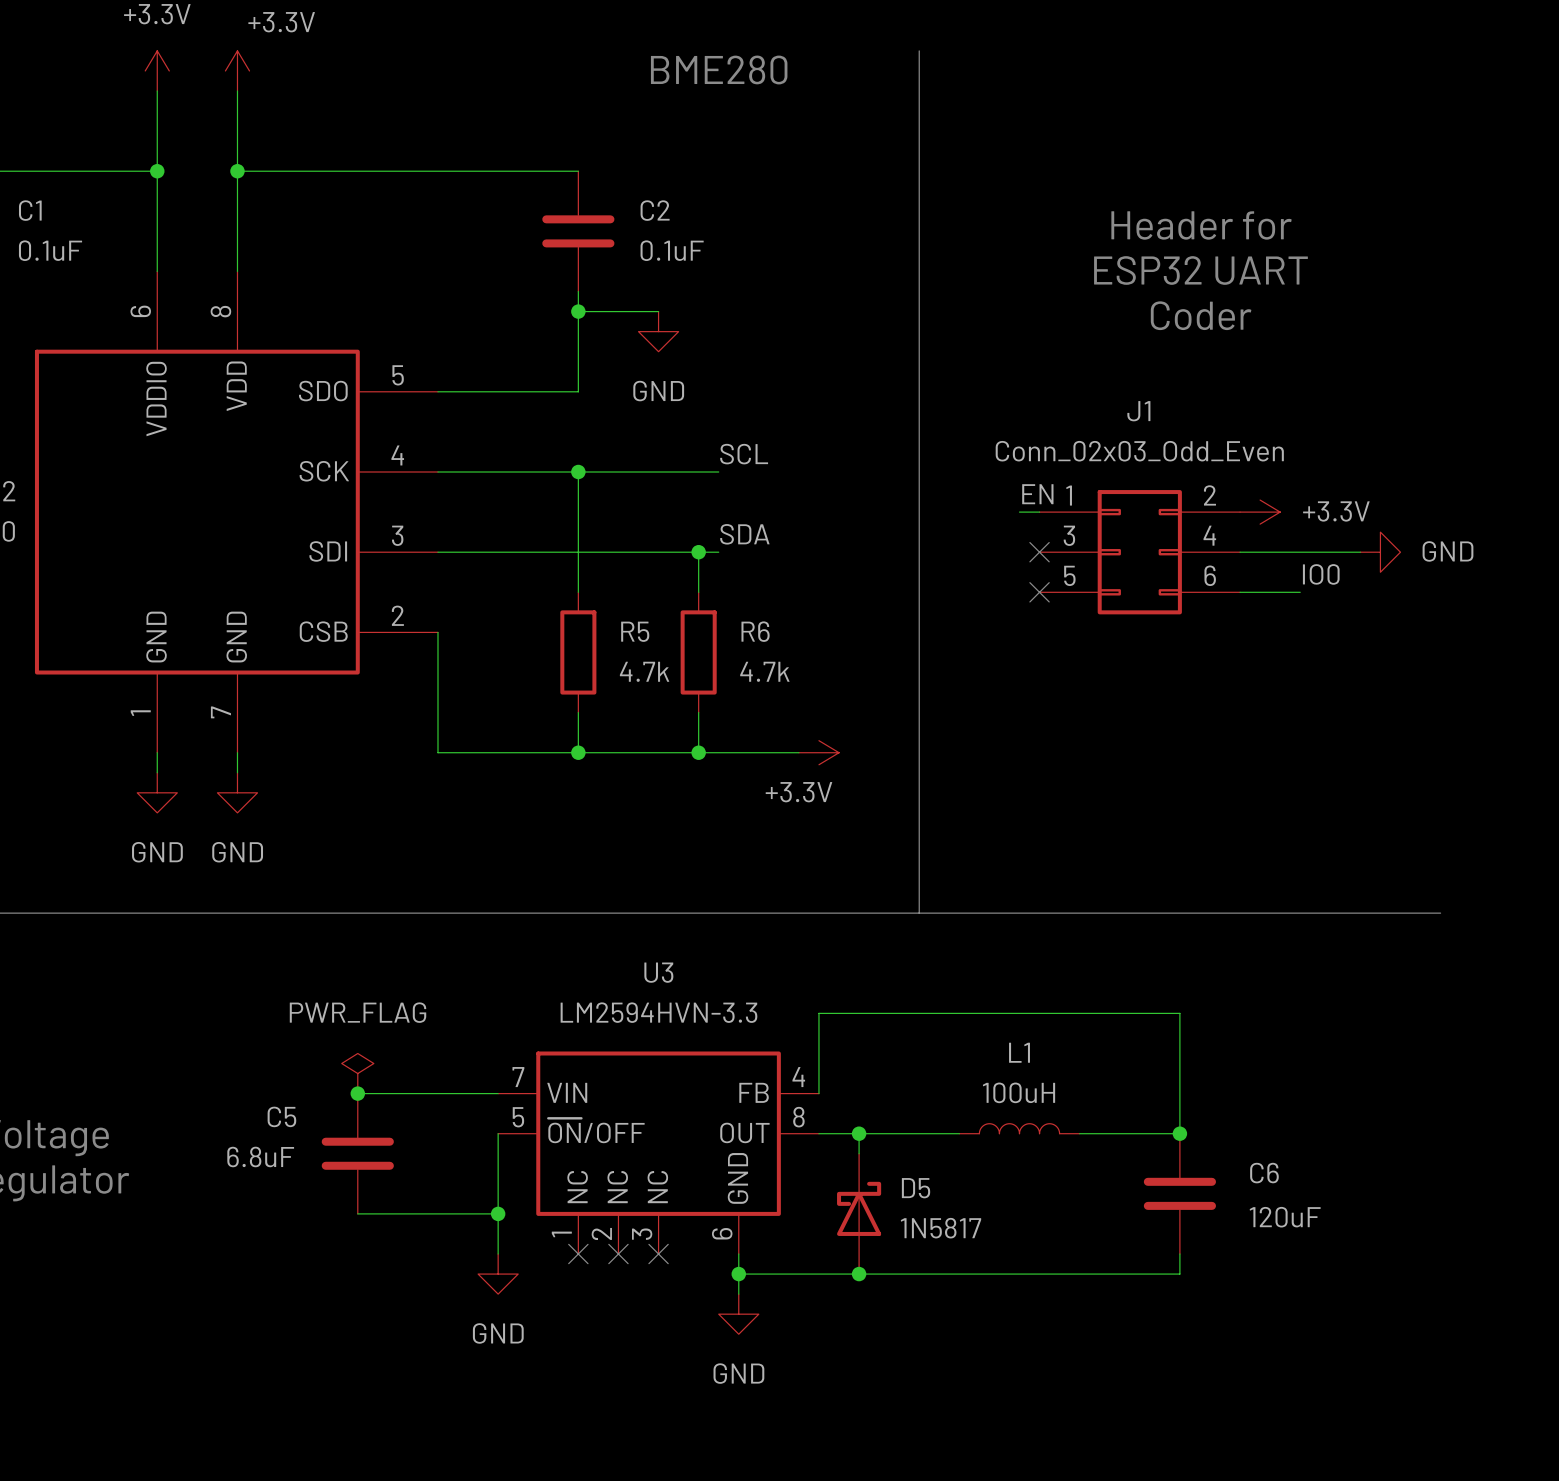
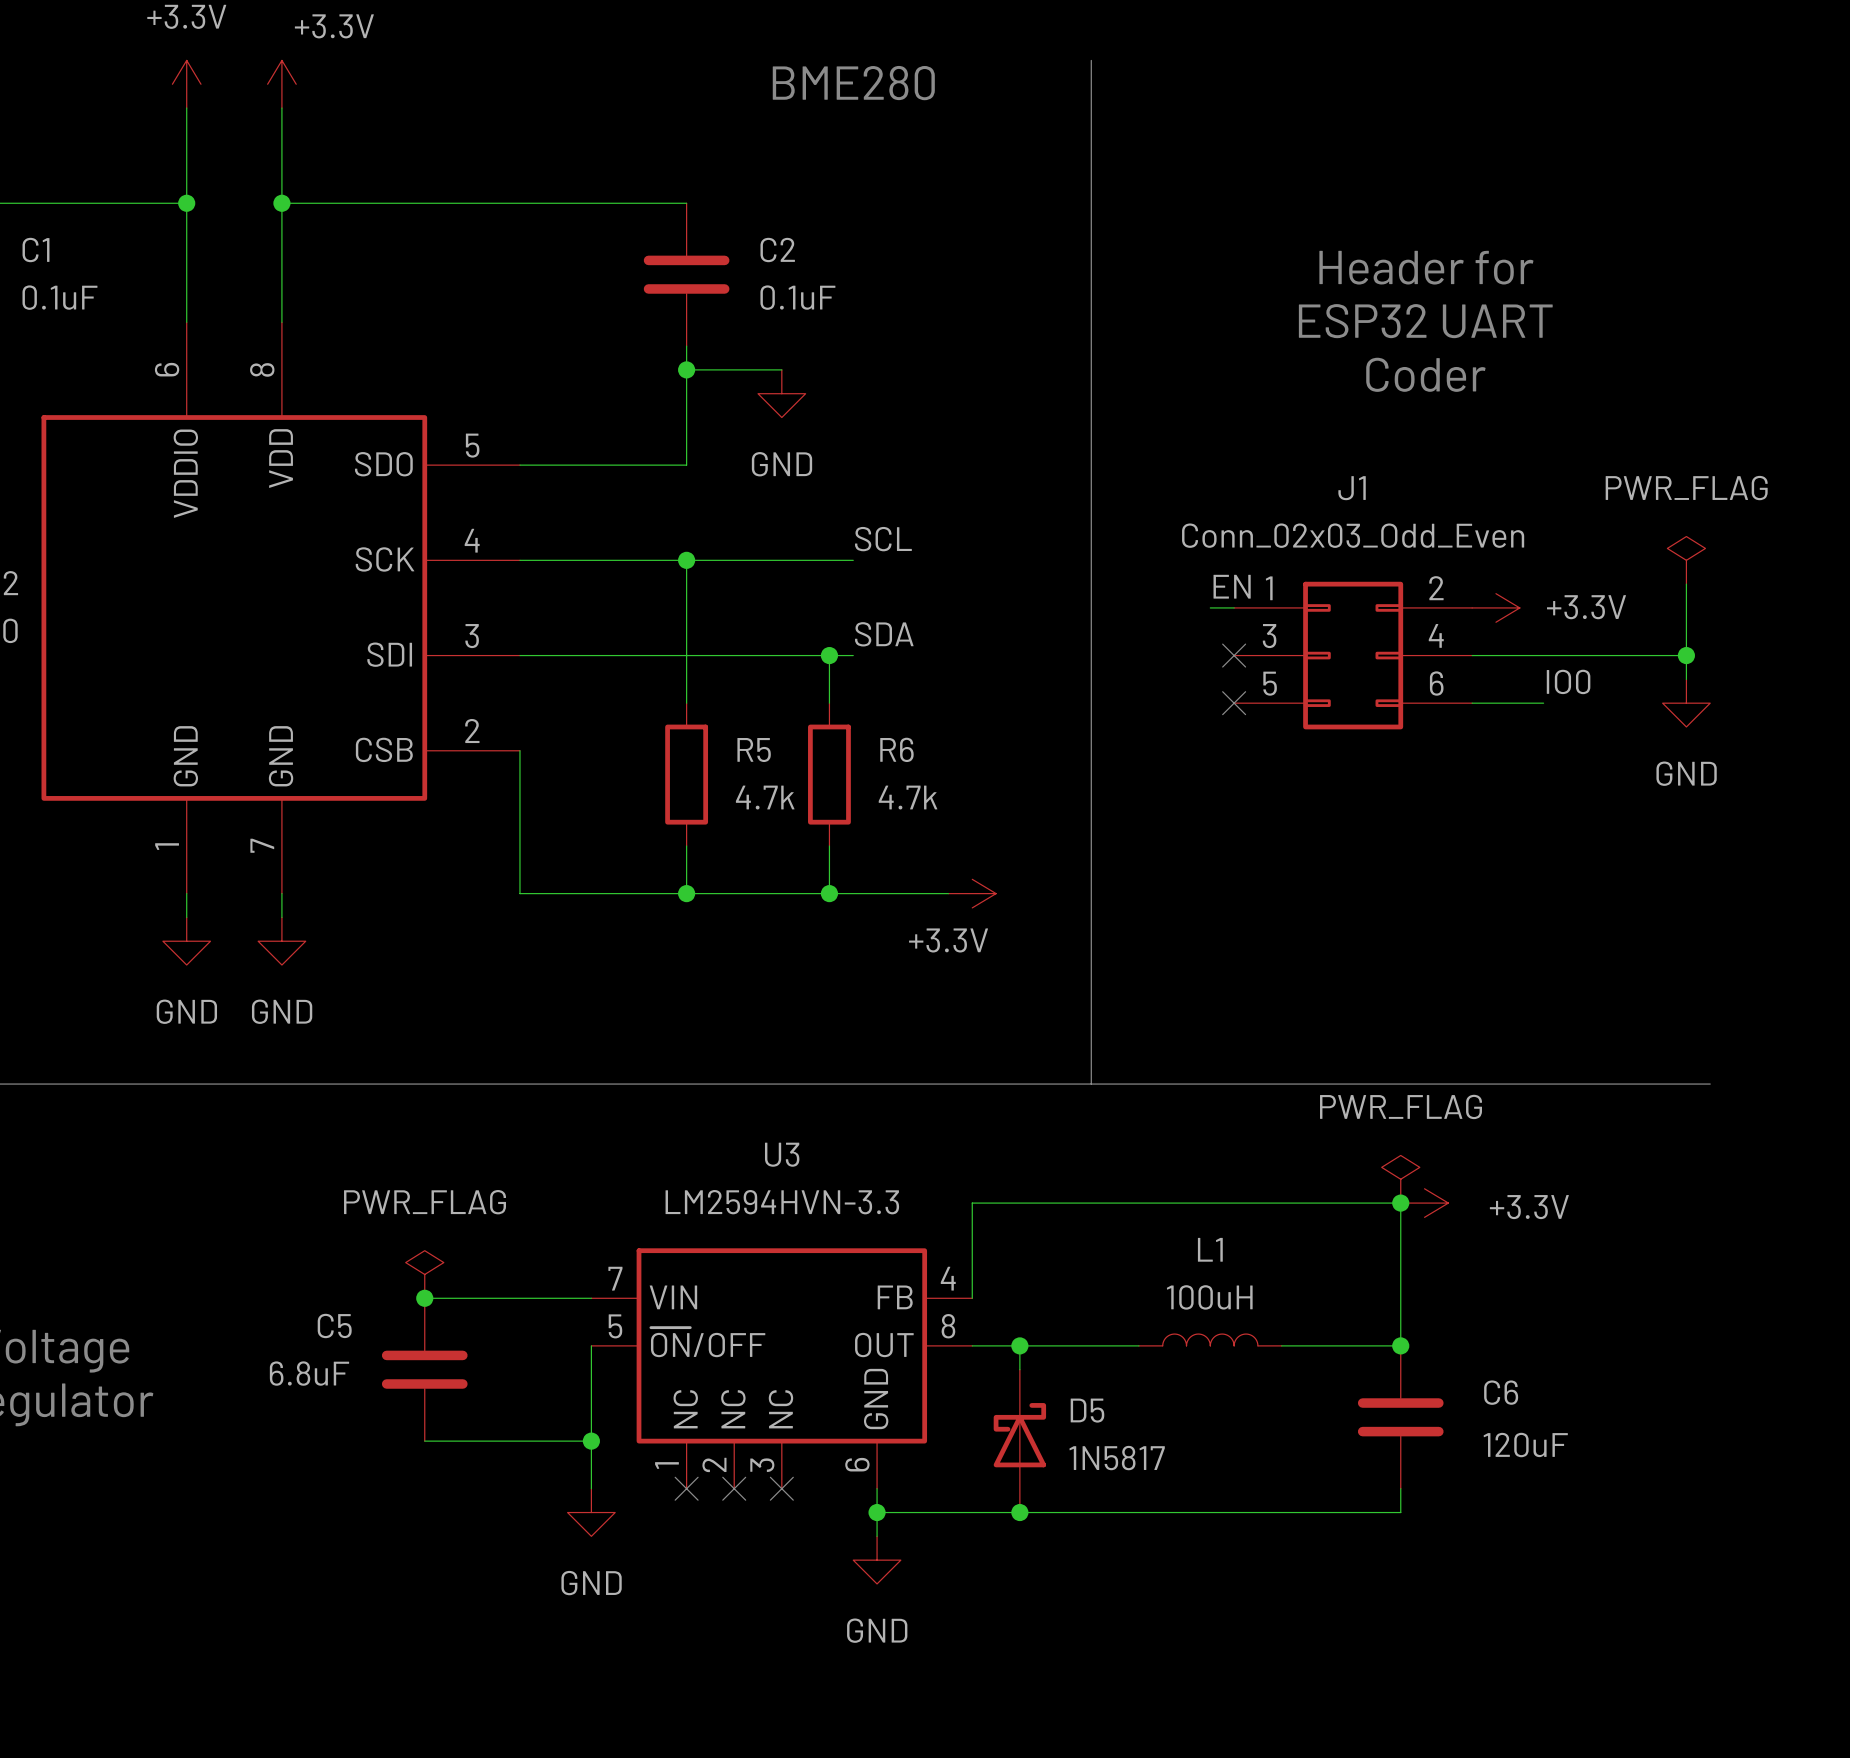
power symbol: none -> PWR_FLAG (1686, 560)
wire: none -> (1686, 584) (1686, 679)
wire: none -> (1615, 655) (1686, 655)
power symbol rotation: 0° (1380, 552) -> 90° clockwise (1686, 703)
power symbol position: GND (1380, 552) -> GND (1686, 703)
junction: none -> (1686, 655)
power symbol: none -> PWR_FLAG (1400, 1179)
junction: none -> (1400, 1203)
power symbol: none -> +3.3V (1424, 1203)

